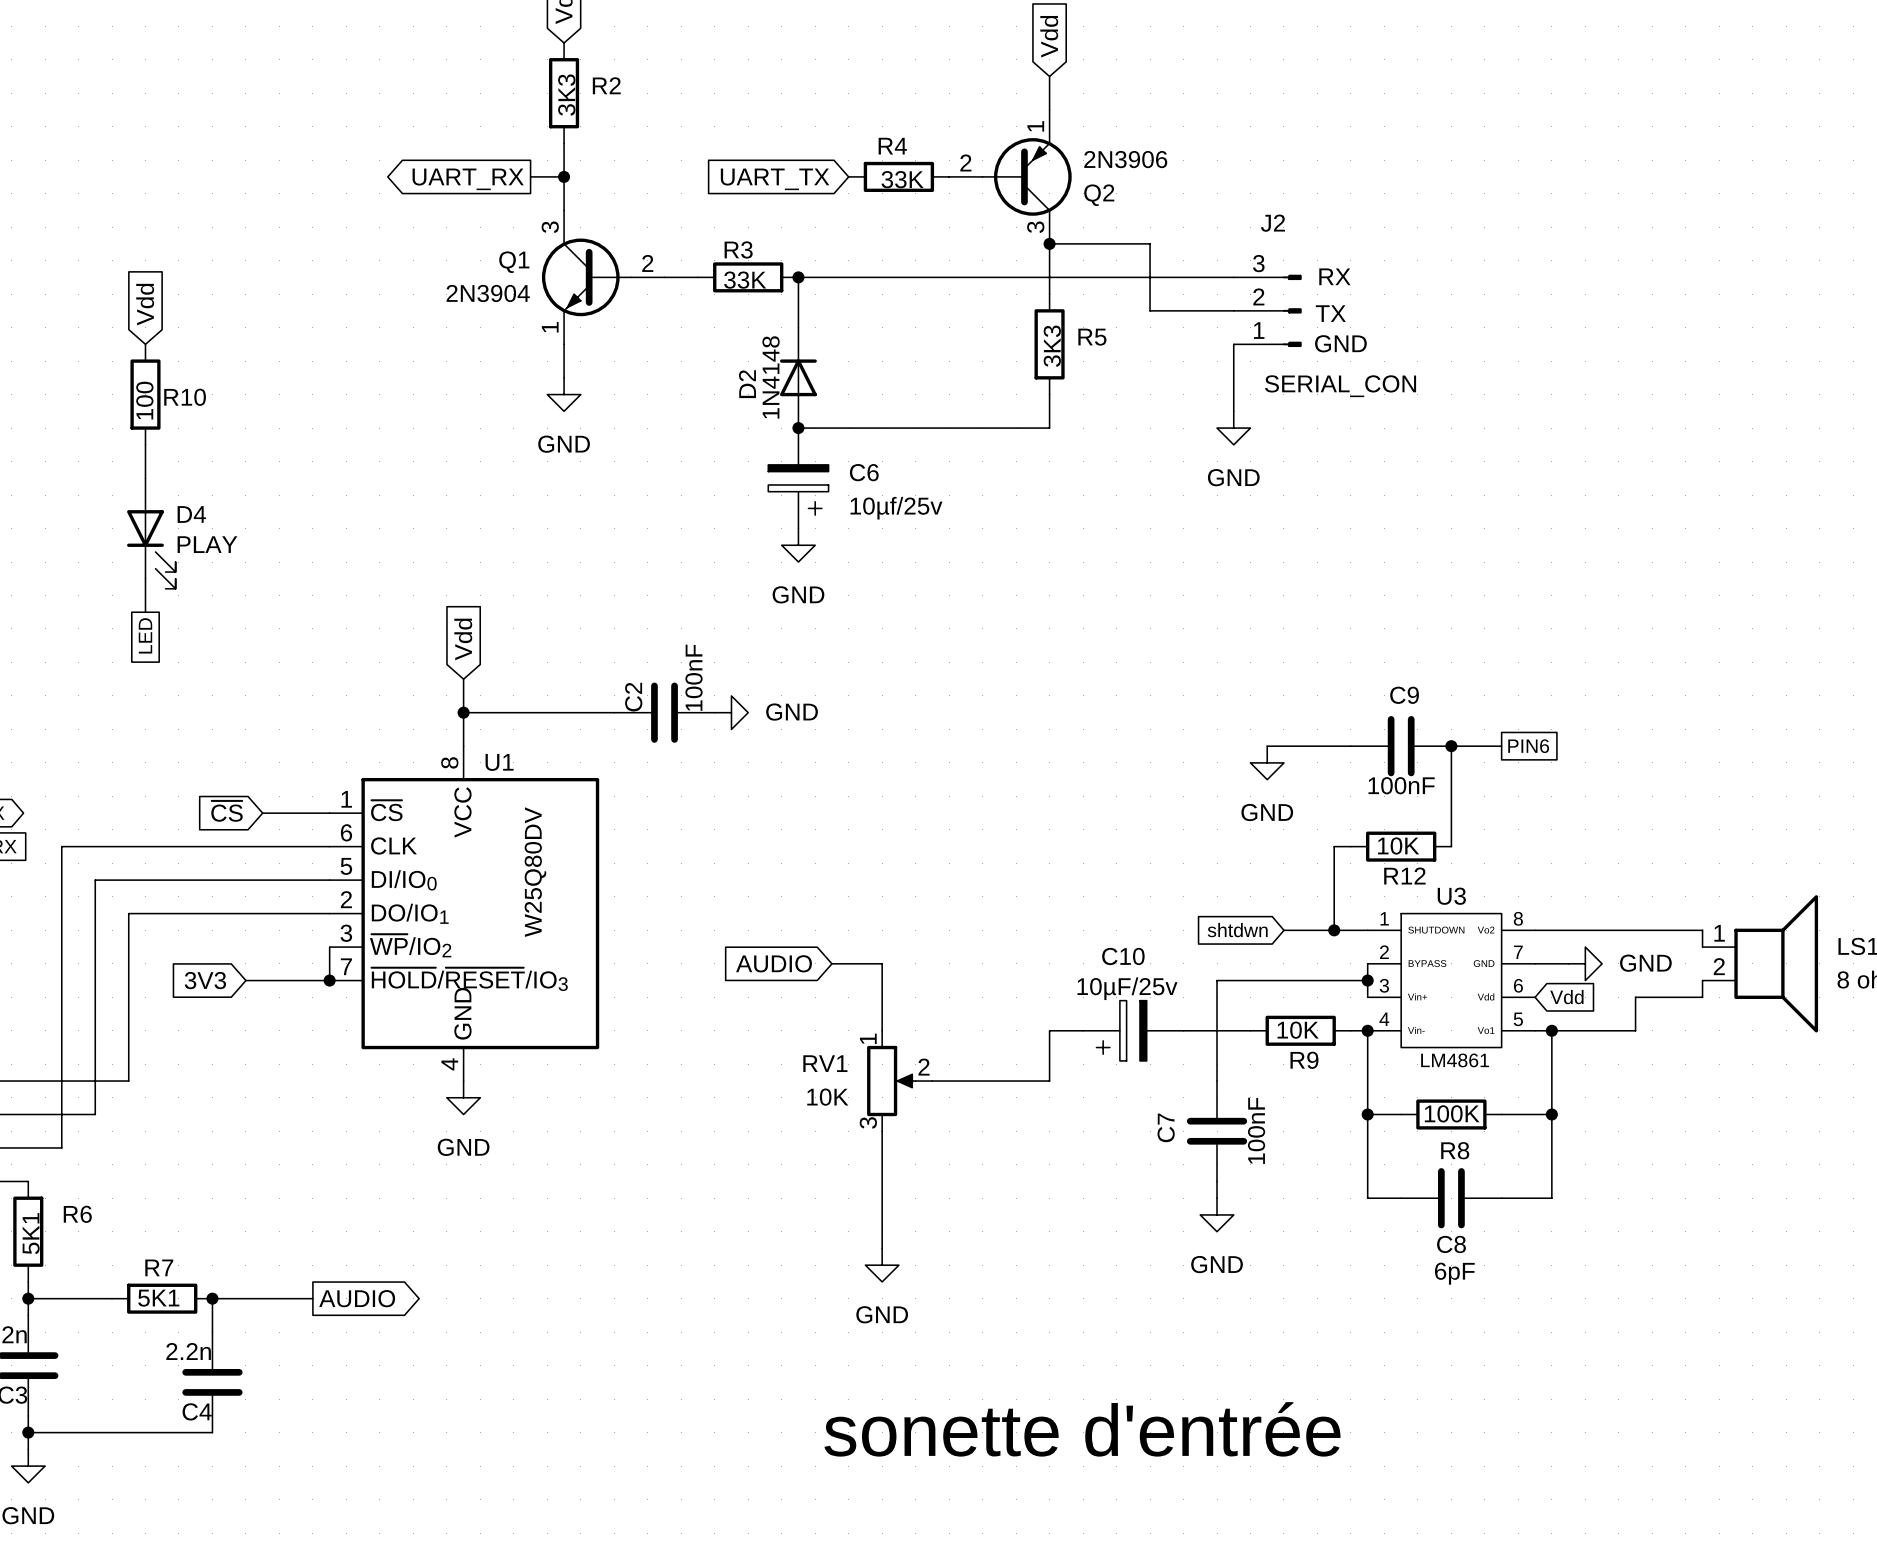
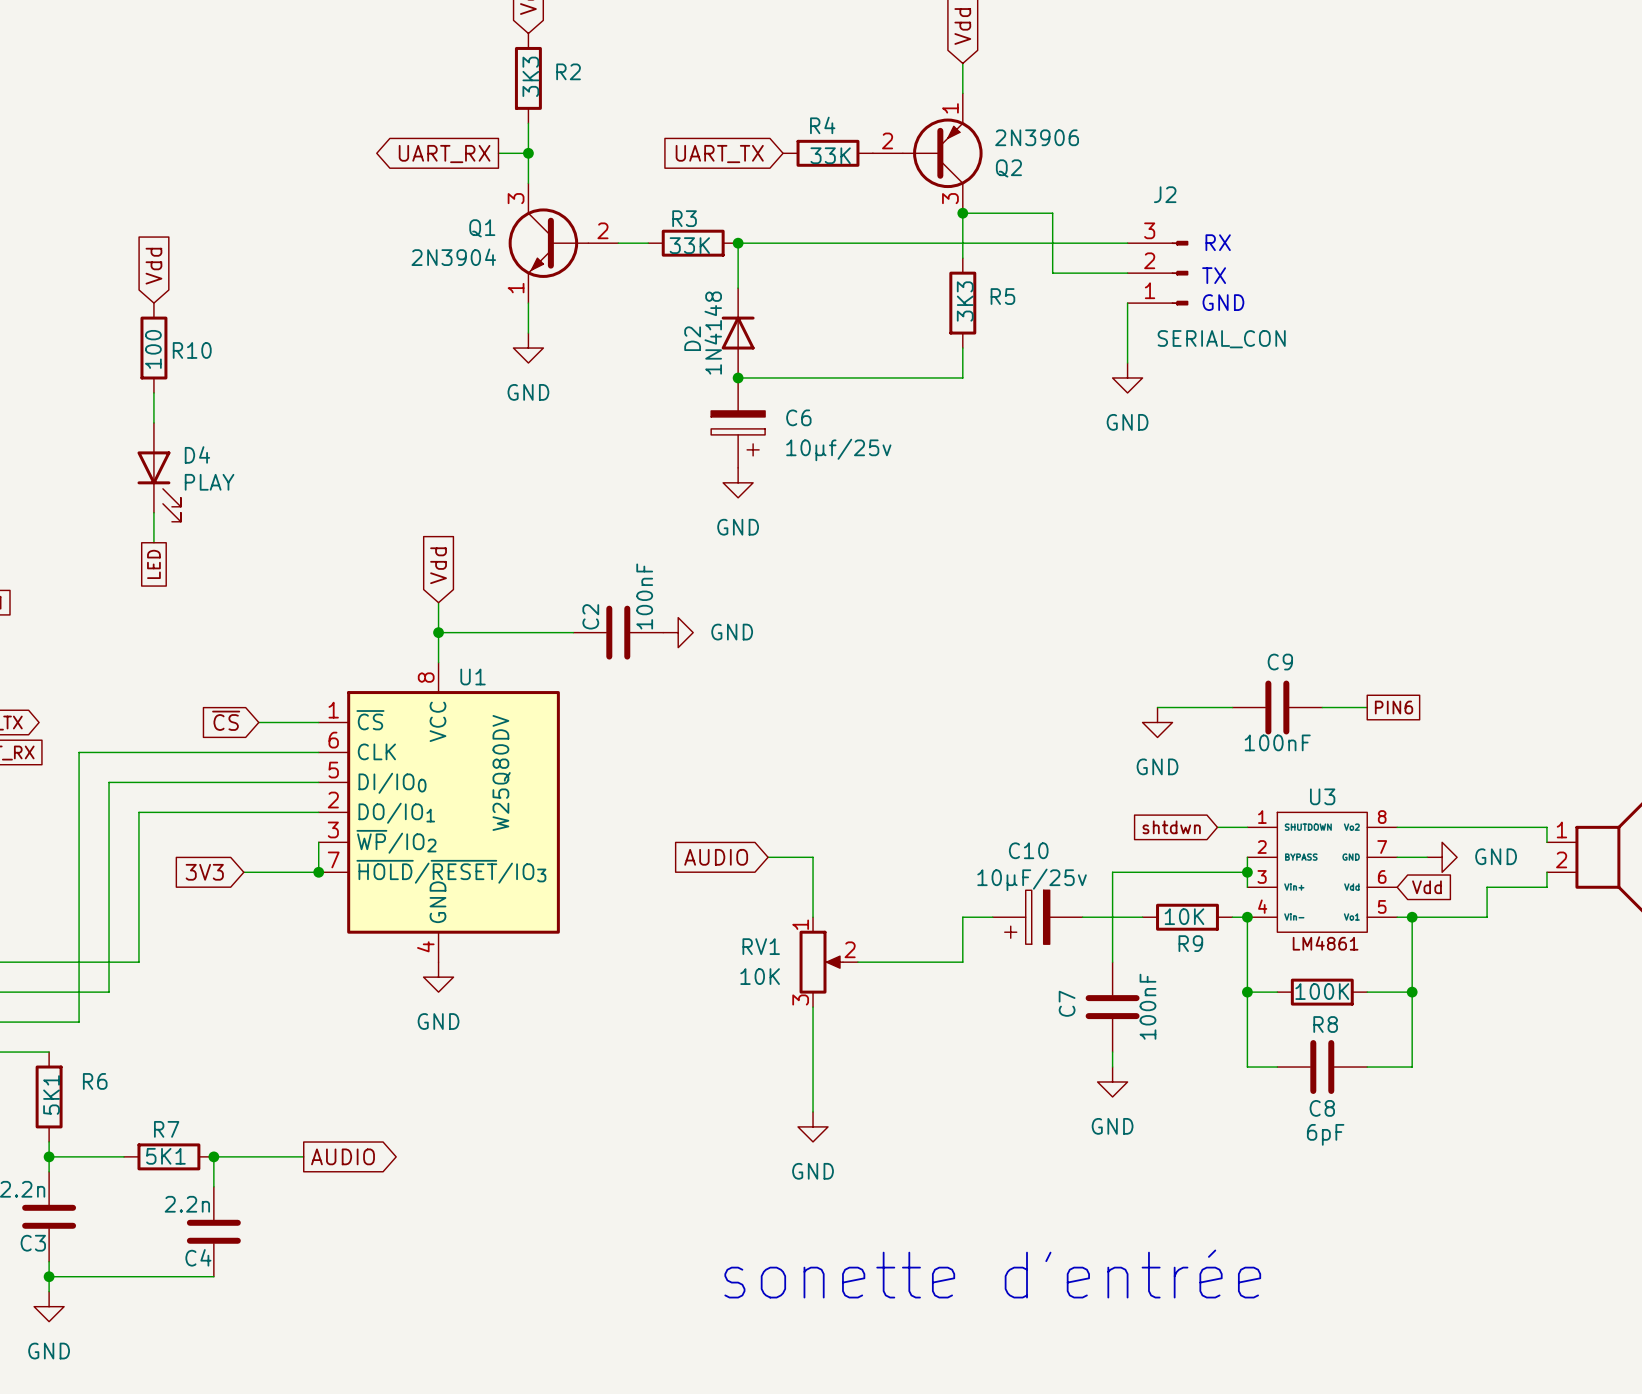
wire: (1267, 746) (1350, 746) -> (1157, 707) (1232, 707)
C9 position: (1401, 746) -> (1277, 707)
junction: (1451, 746) -> none
wire: (1501, 746) (1451, 746) (1451, 846) -> none
global label position: PIN6 (1528, 746) -> PIN6 (1394, 707)
power symbol position: GND (1267, 762) -> GND (1157, 722)
wire: none -> (1322, 707) (1367, 707)
wire: (1350, 846) (1334, 846) (1334, 930) (1283, 930) -> none
R12: 10K (1401, 846) -> none
global label position: shtdwn (1237, 930) -> shtdwn (1171, 827)
junction: (1334, 930) -> none

